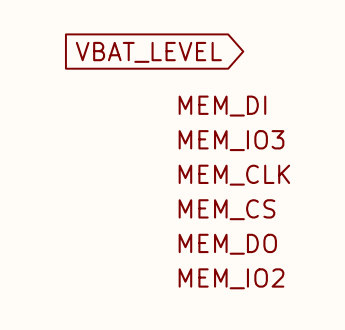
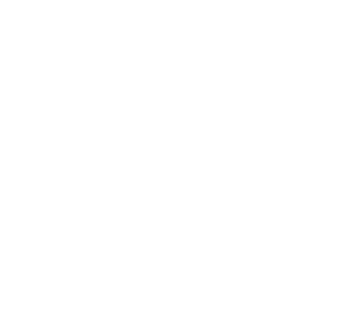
global label: VBAT_LEVEL (148, 52) -> none
label: MEM_DI (222, 106) -> none
label: MEM_IO3 (231, 140) -> none
label: MEM_CLK (234, 175) -> none
label: MEM_CS (226, 209) -> none
label: MEM_DO (227, 244) -> none
label: MEM_IO2 (231, 278) -> none

